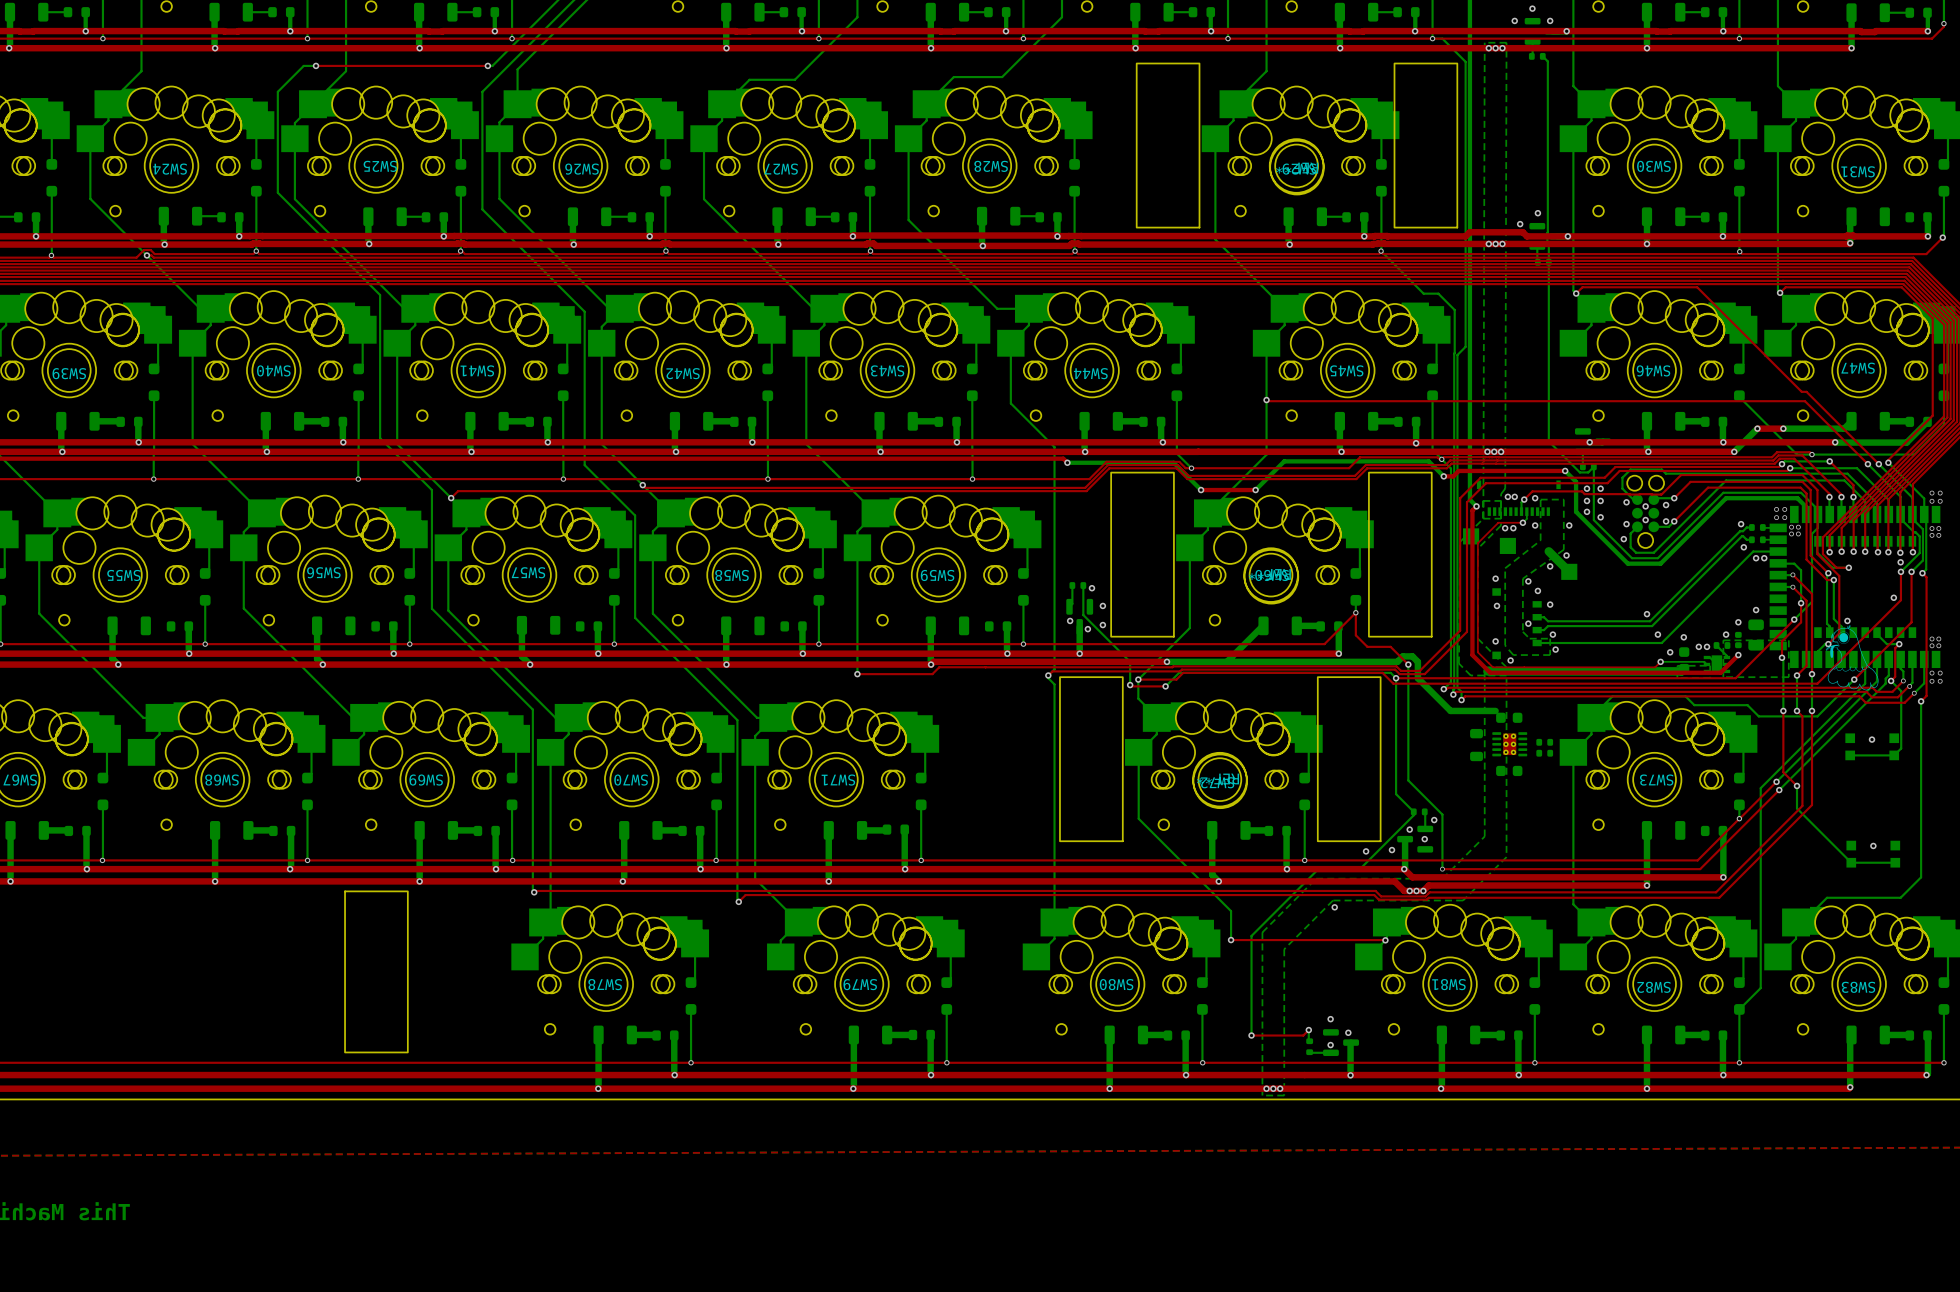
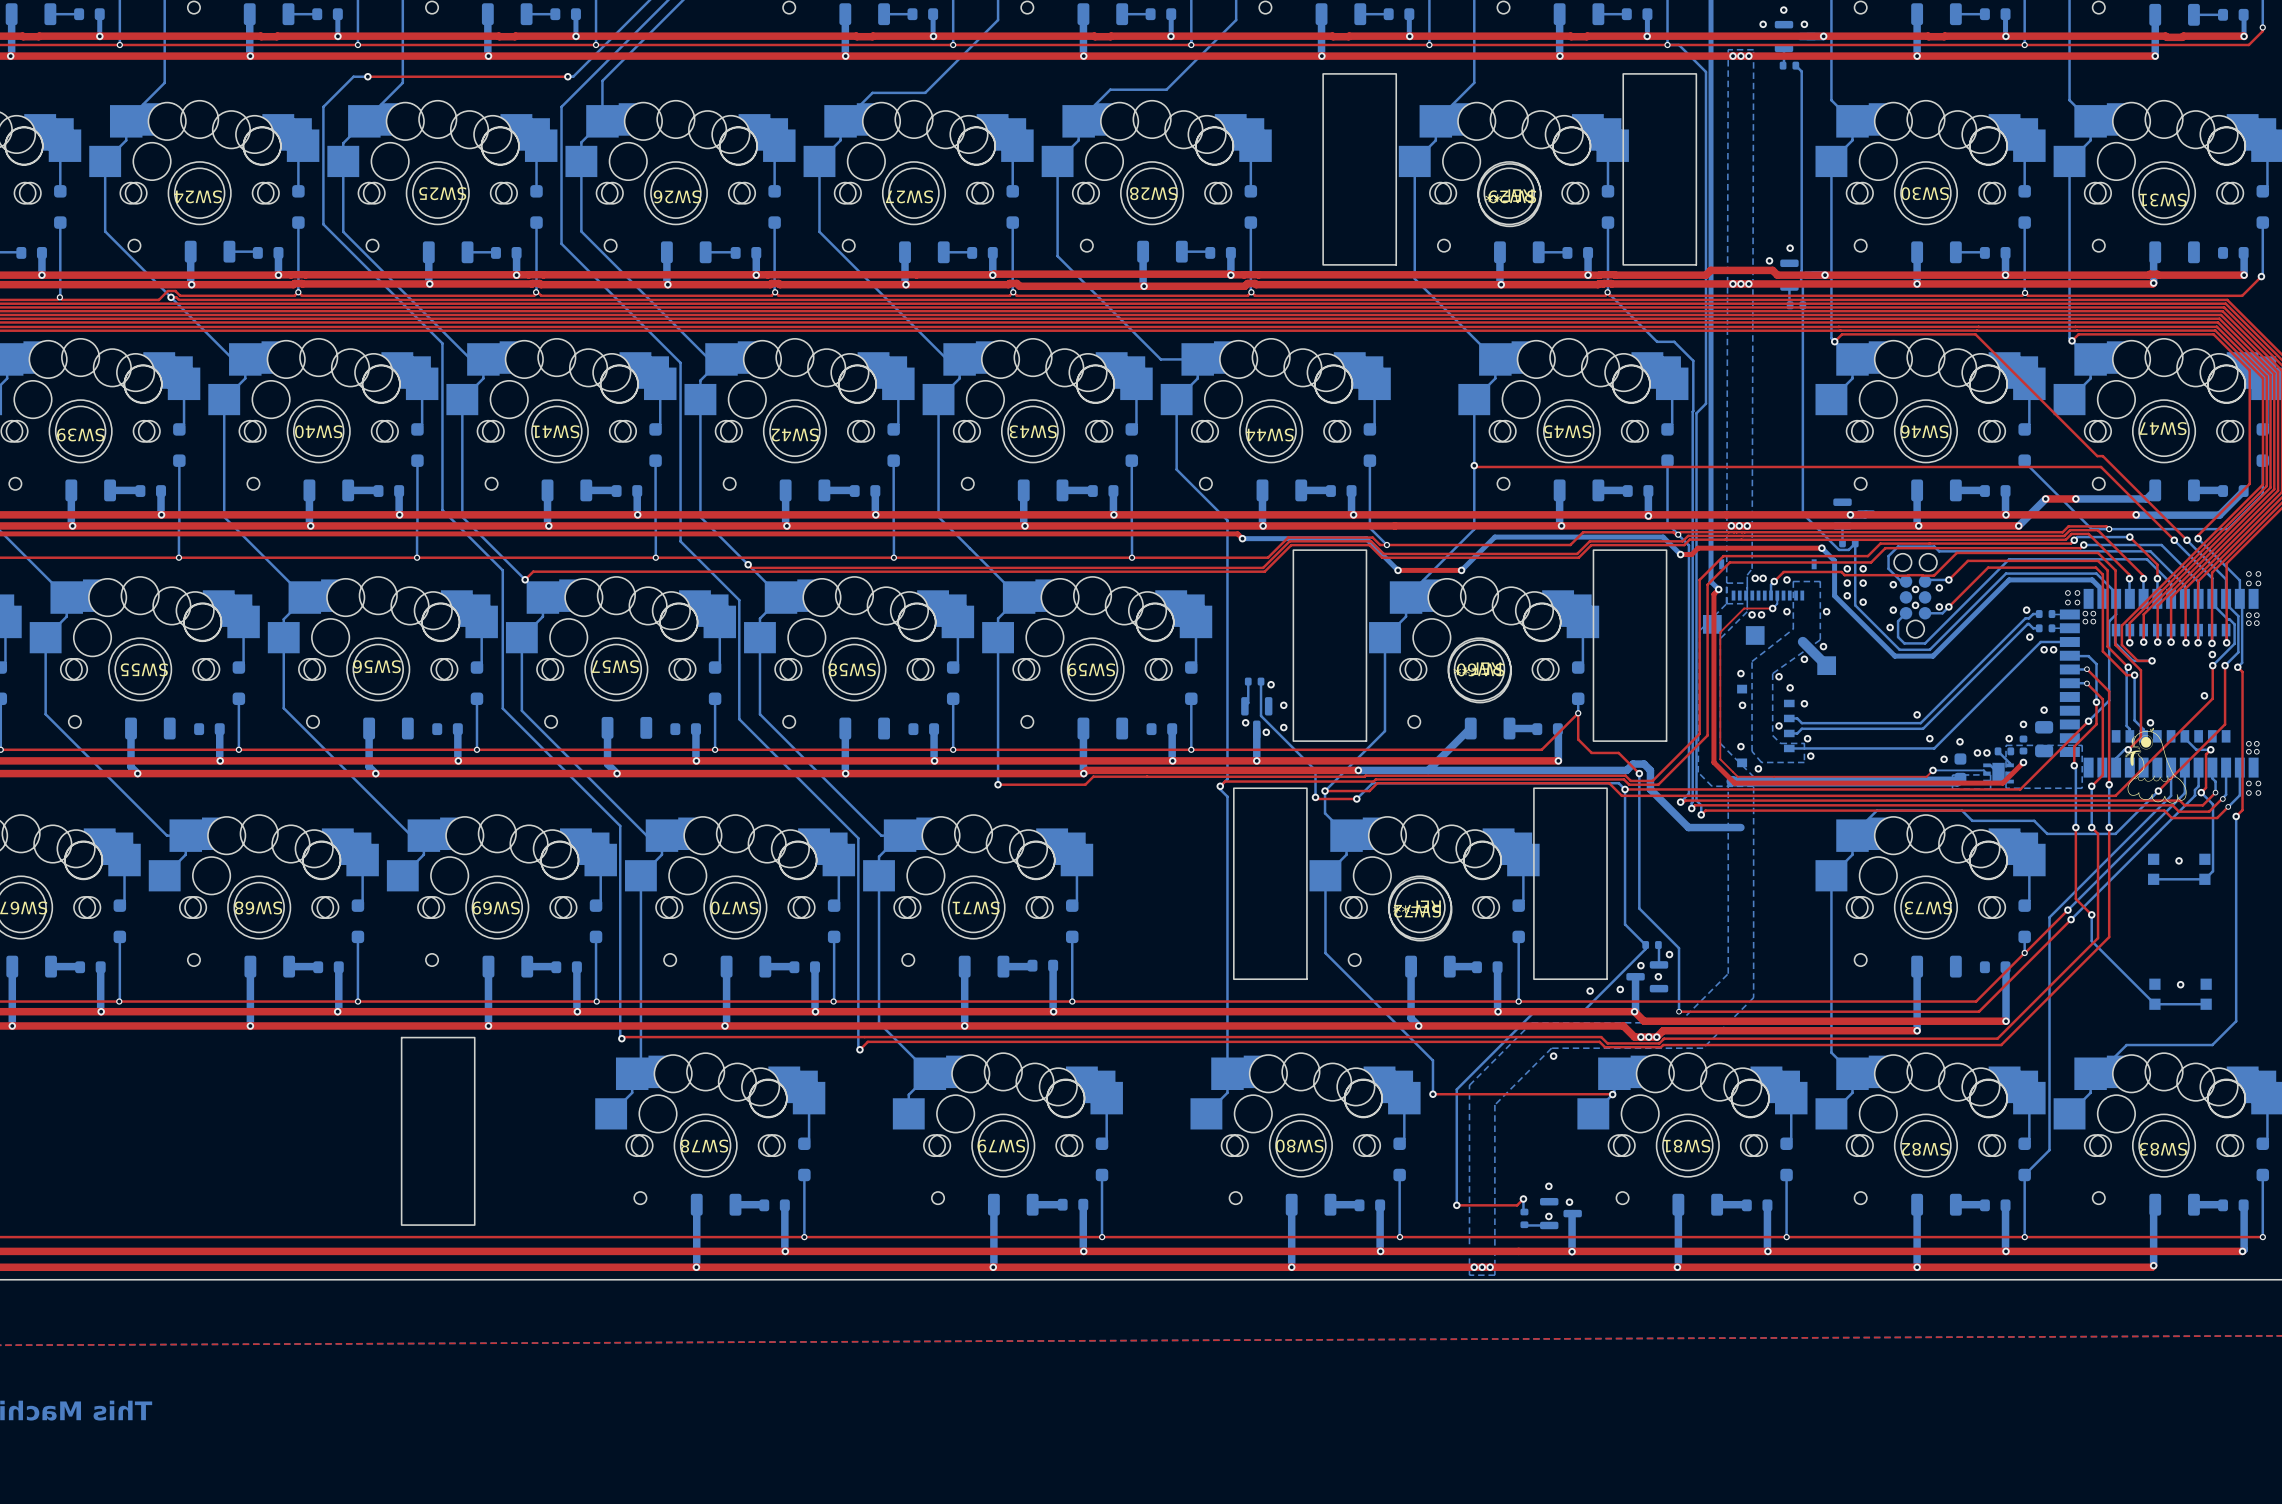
part: (1509, 717) -> none
part: (1544, 742) -> none
part: (1509, 744) -> none
part: (1476, 745) -> none
part: (1544, 753) -> none
part: (1509, 770) -> none

